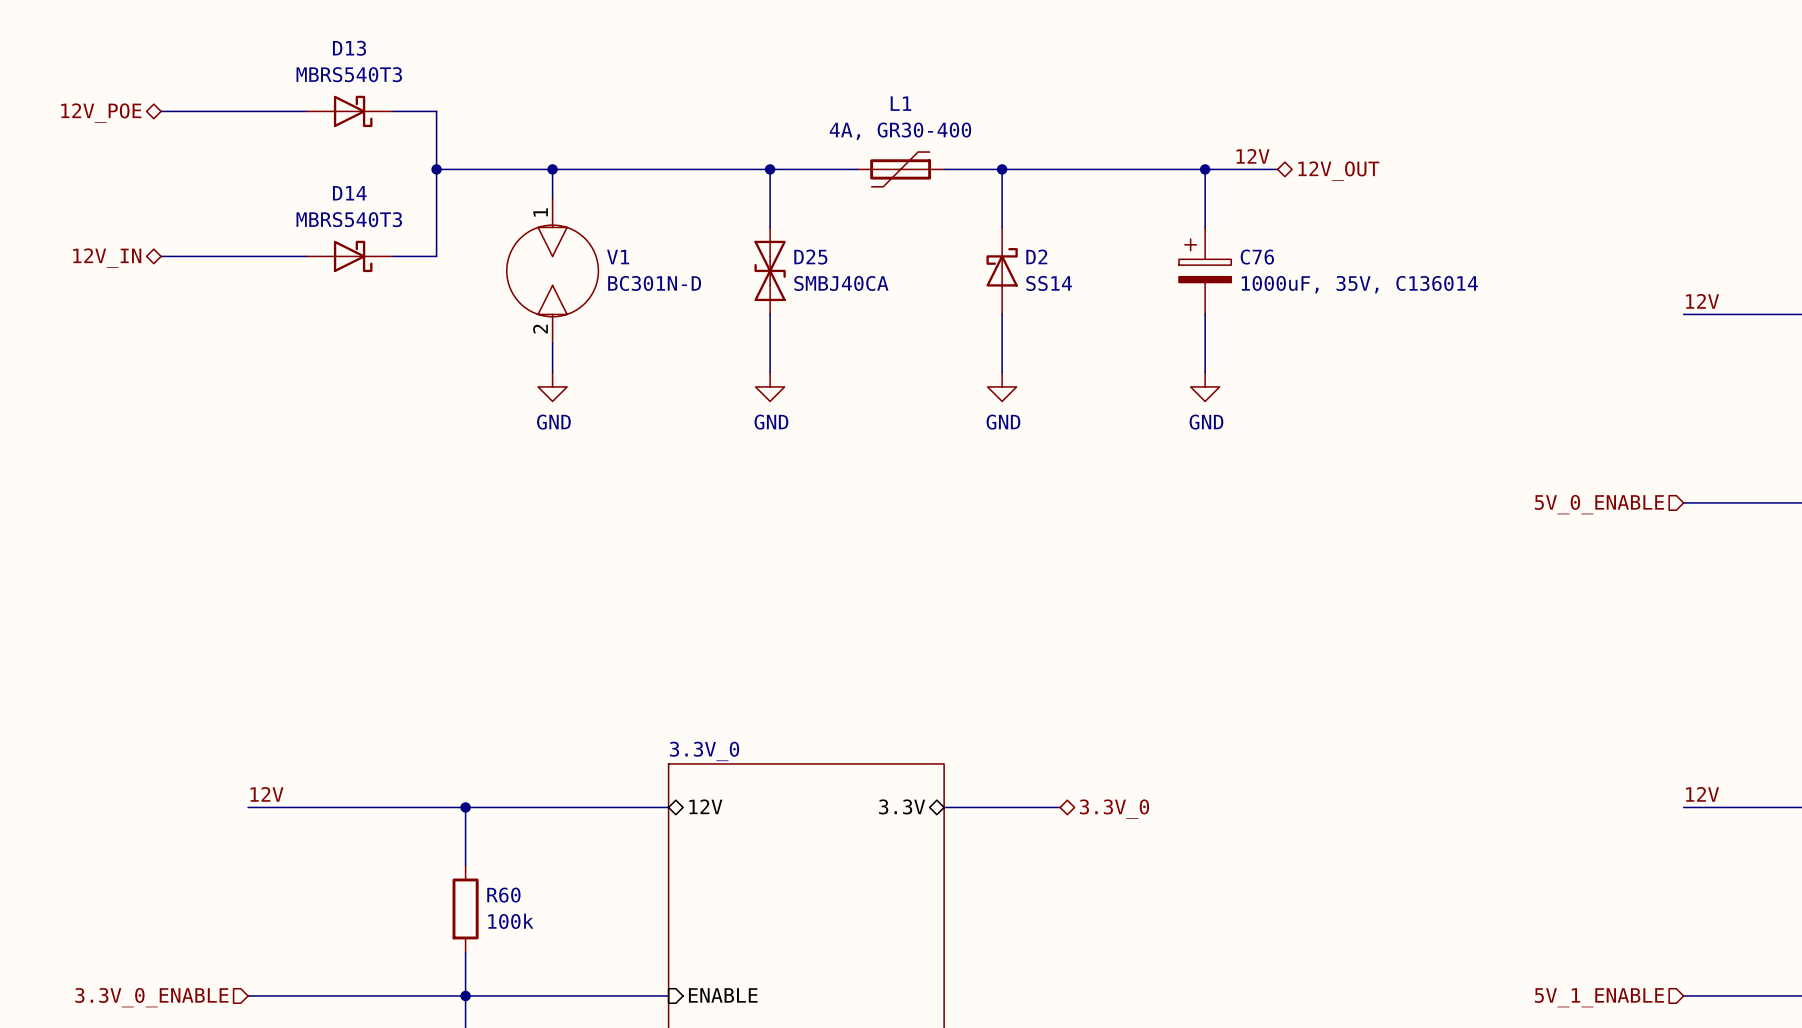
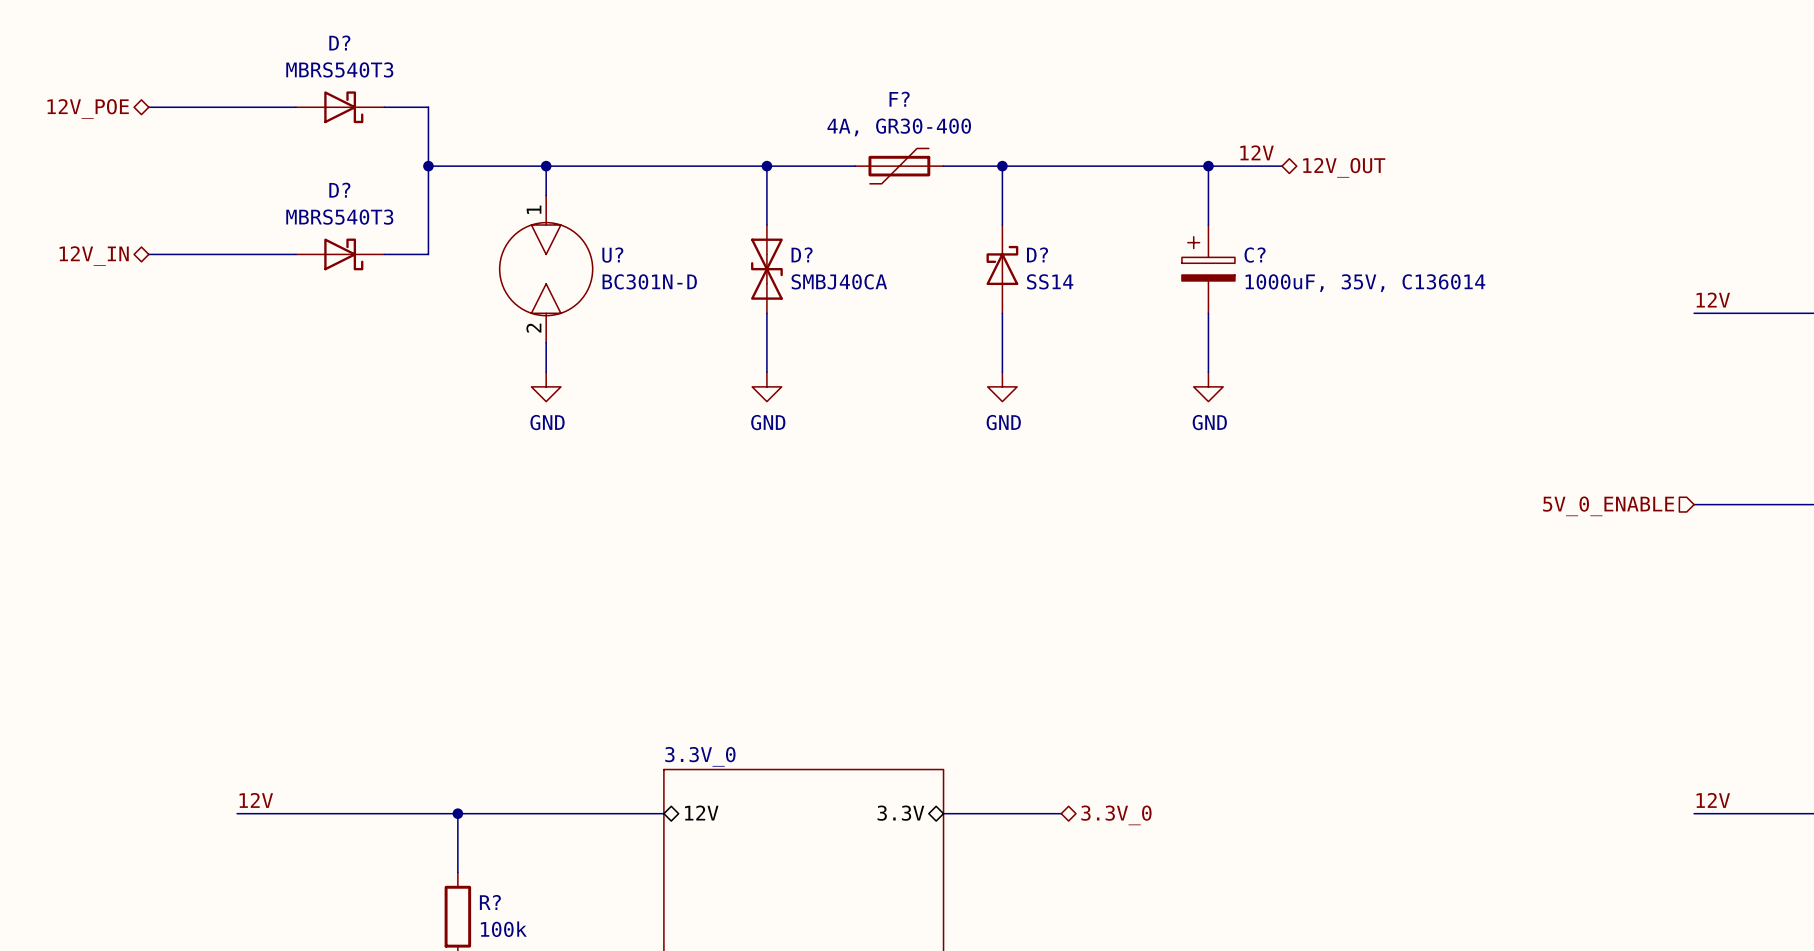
D13 name: D13 (349, 48) -> D? (339, 43)
L1 name: L1 (900, 103) -> F? (899, 99)
D14 name: D14 (349, 193) -> D? (339, 190)
D2 name: D2 (1036, 256) -> D? (1037, 254)
V1 name: V1 (618, 257) -> U? (612, 255)
D25 name: D25 (810, 257) -> D? (802, 254)
C76 name: C76 (1257, 257) -> C? (1255, 255)
R60 name: R60 (503, 895) -> R? (490, 902)

